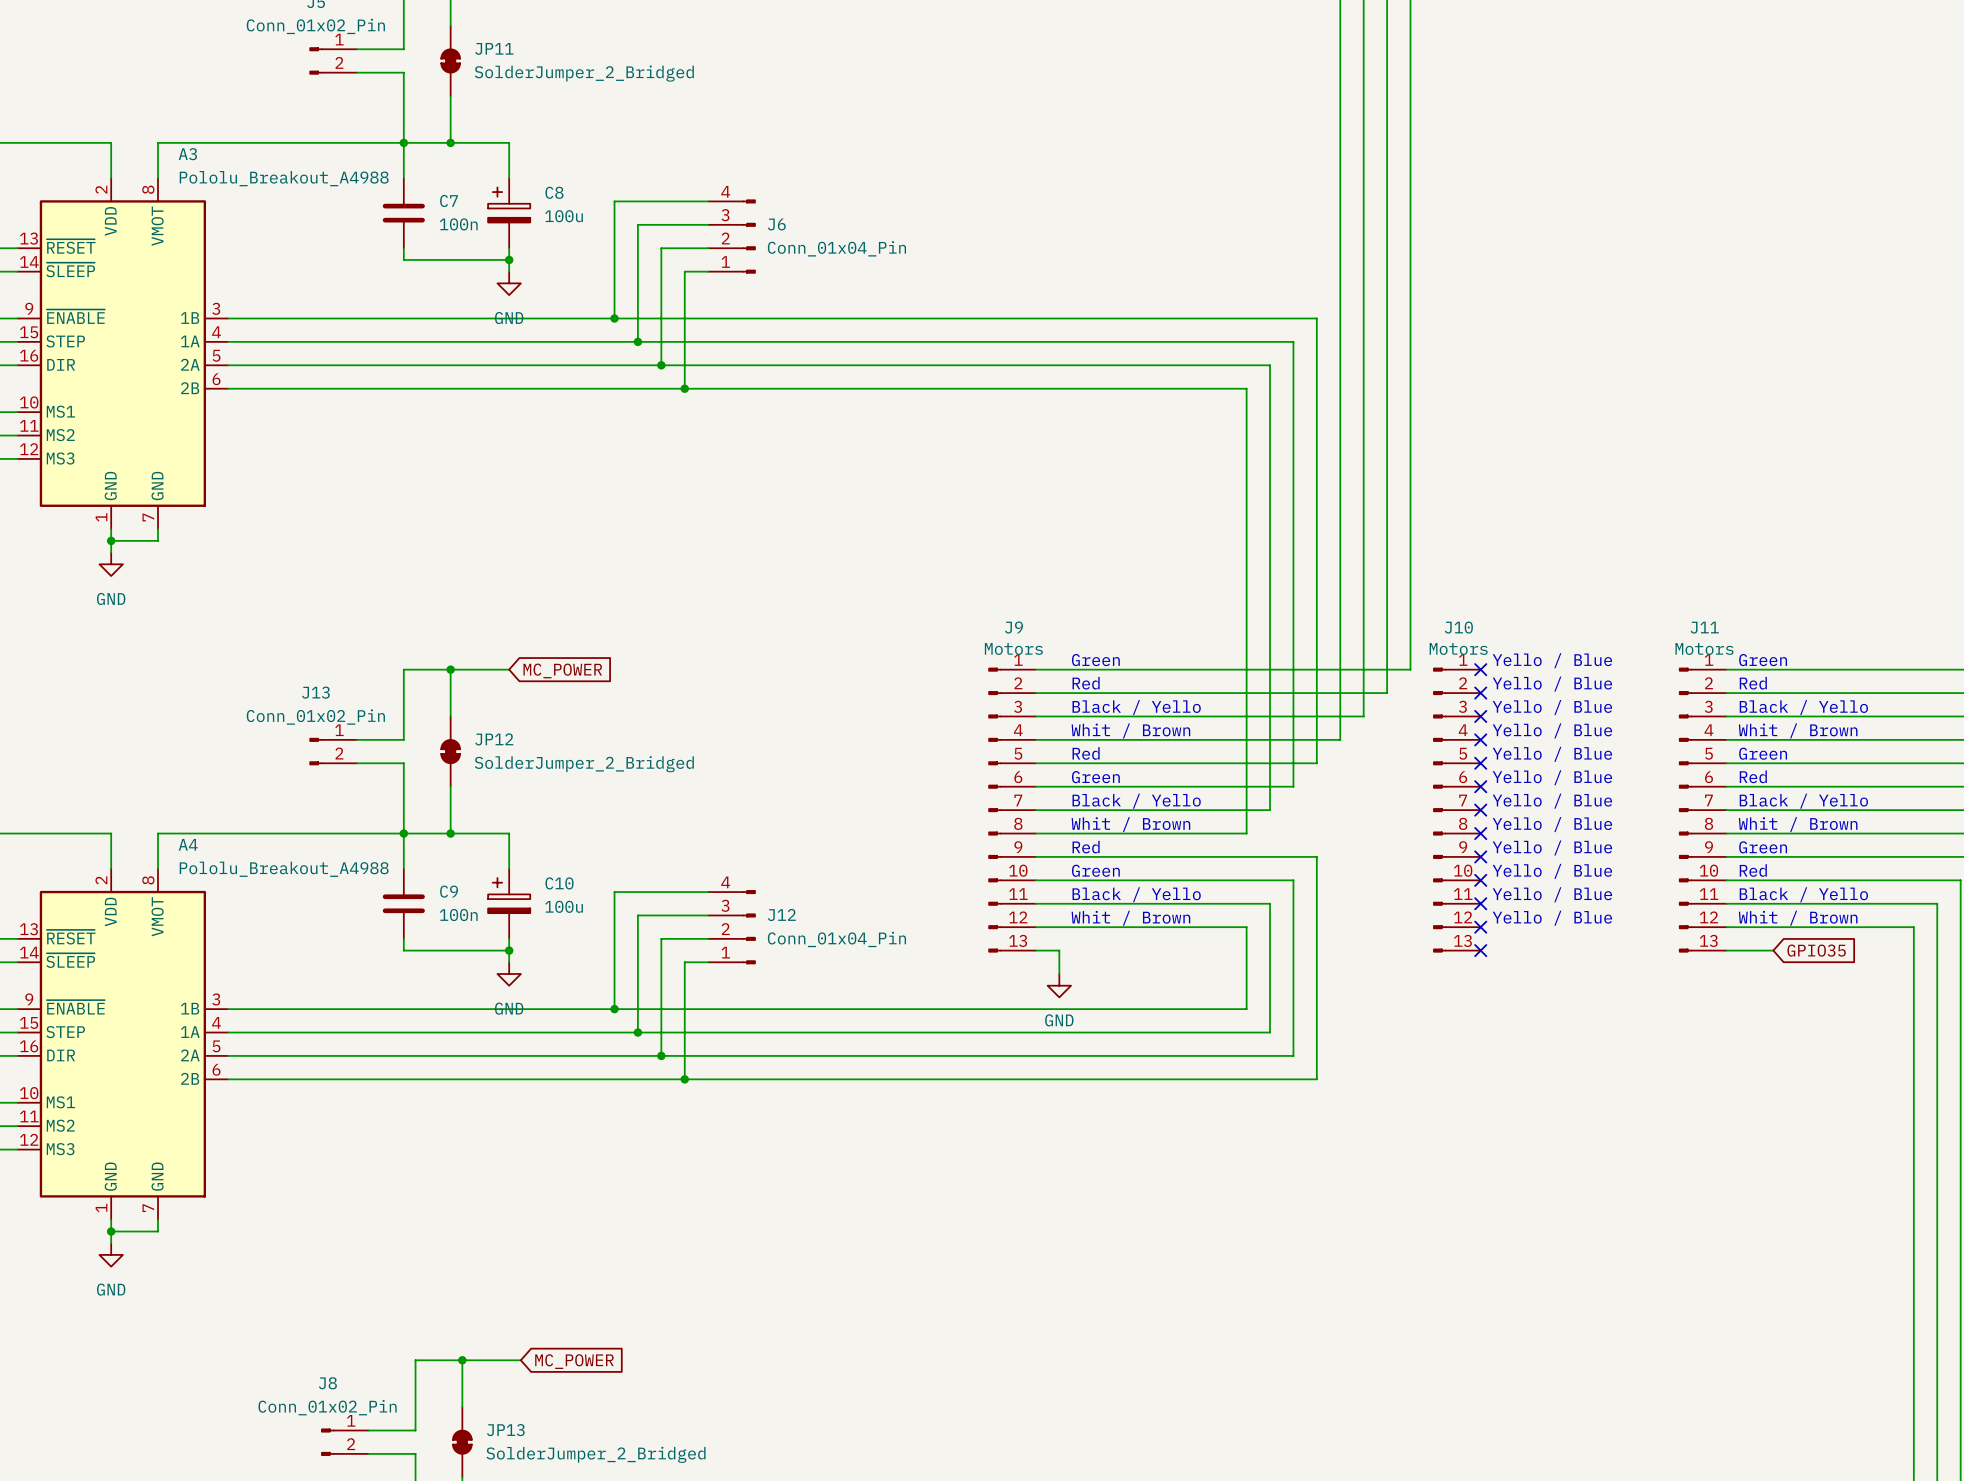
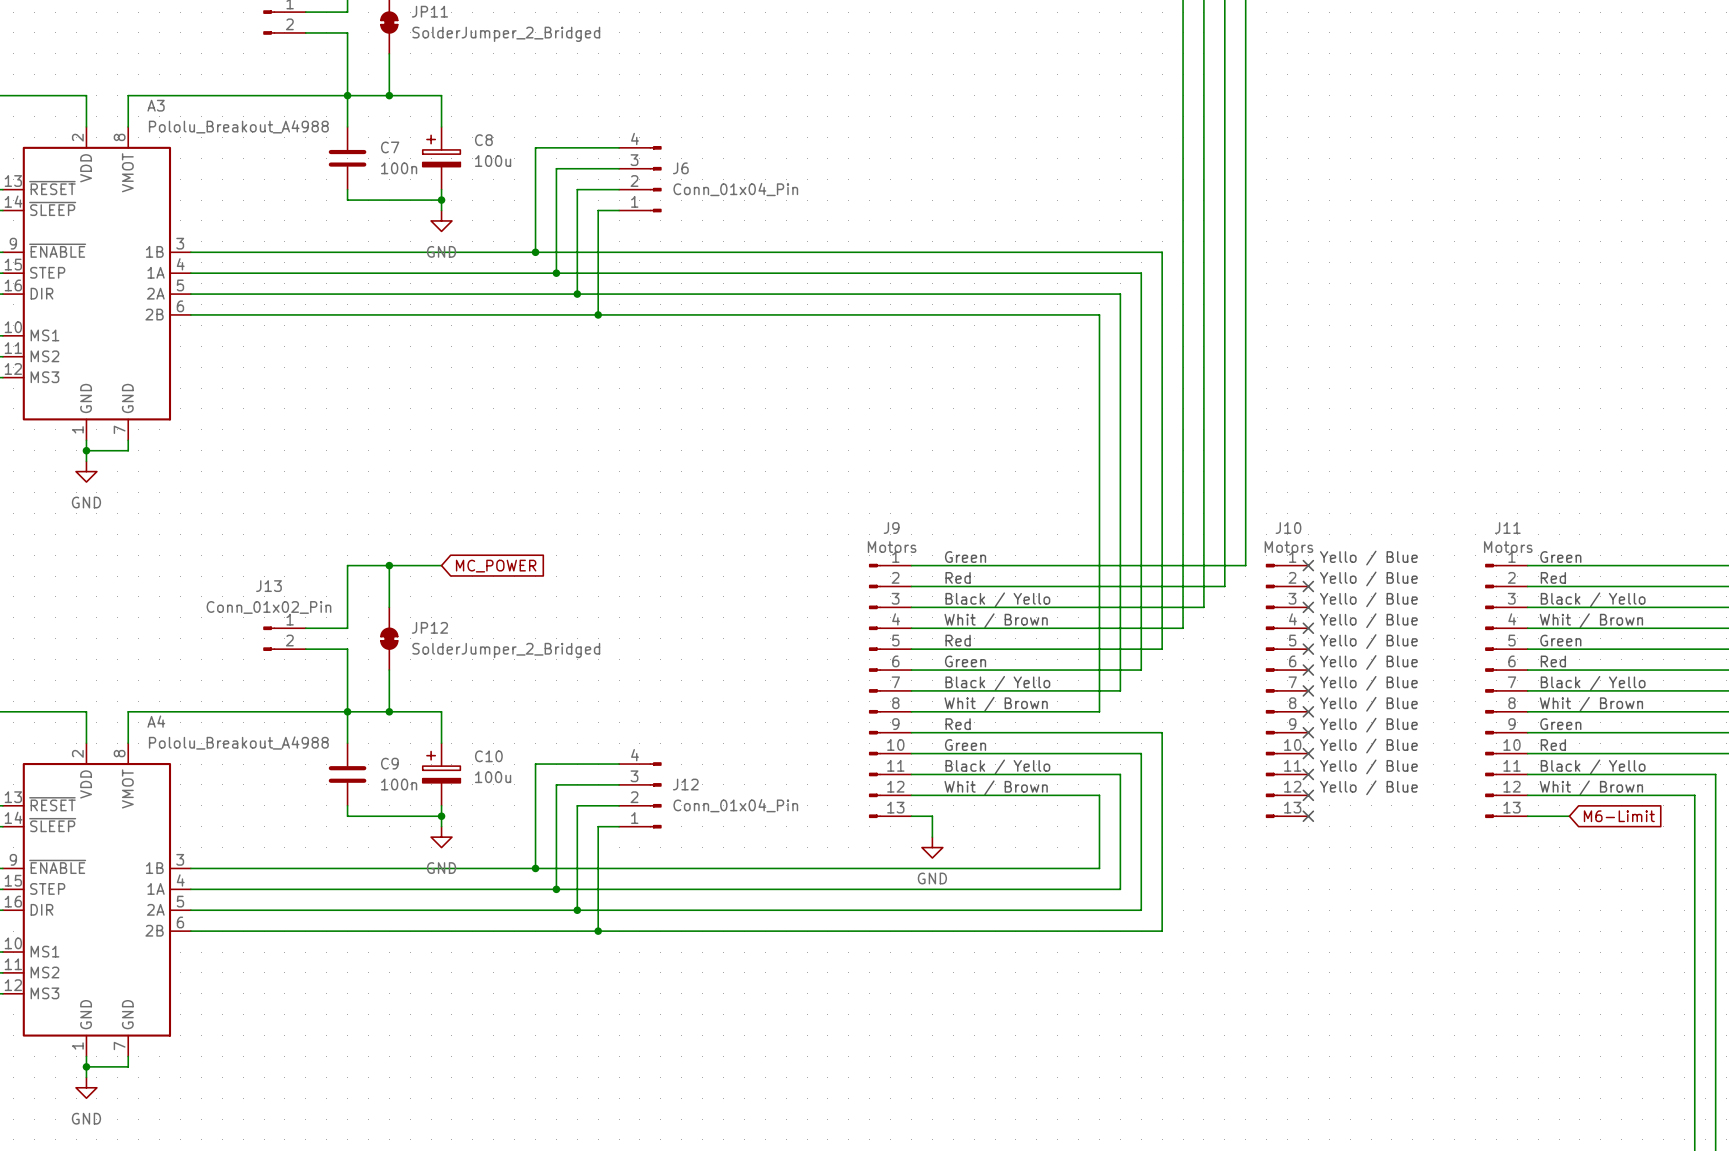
global label: GPIO35 (1816, 950) -> M6-Limit (1619, 816)

